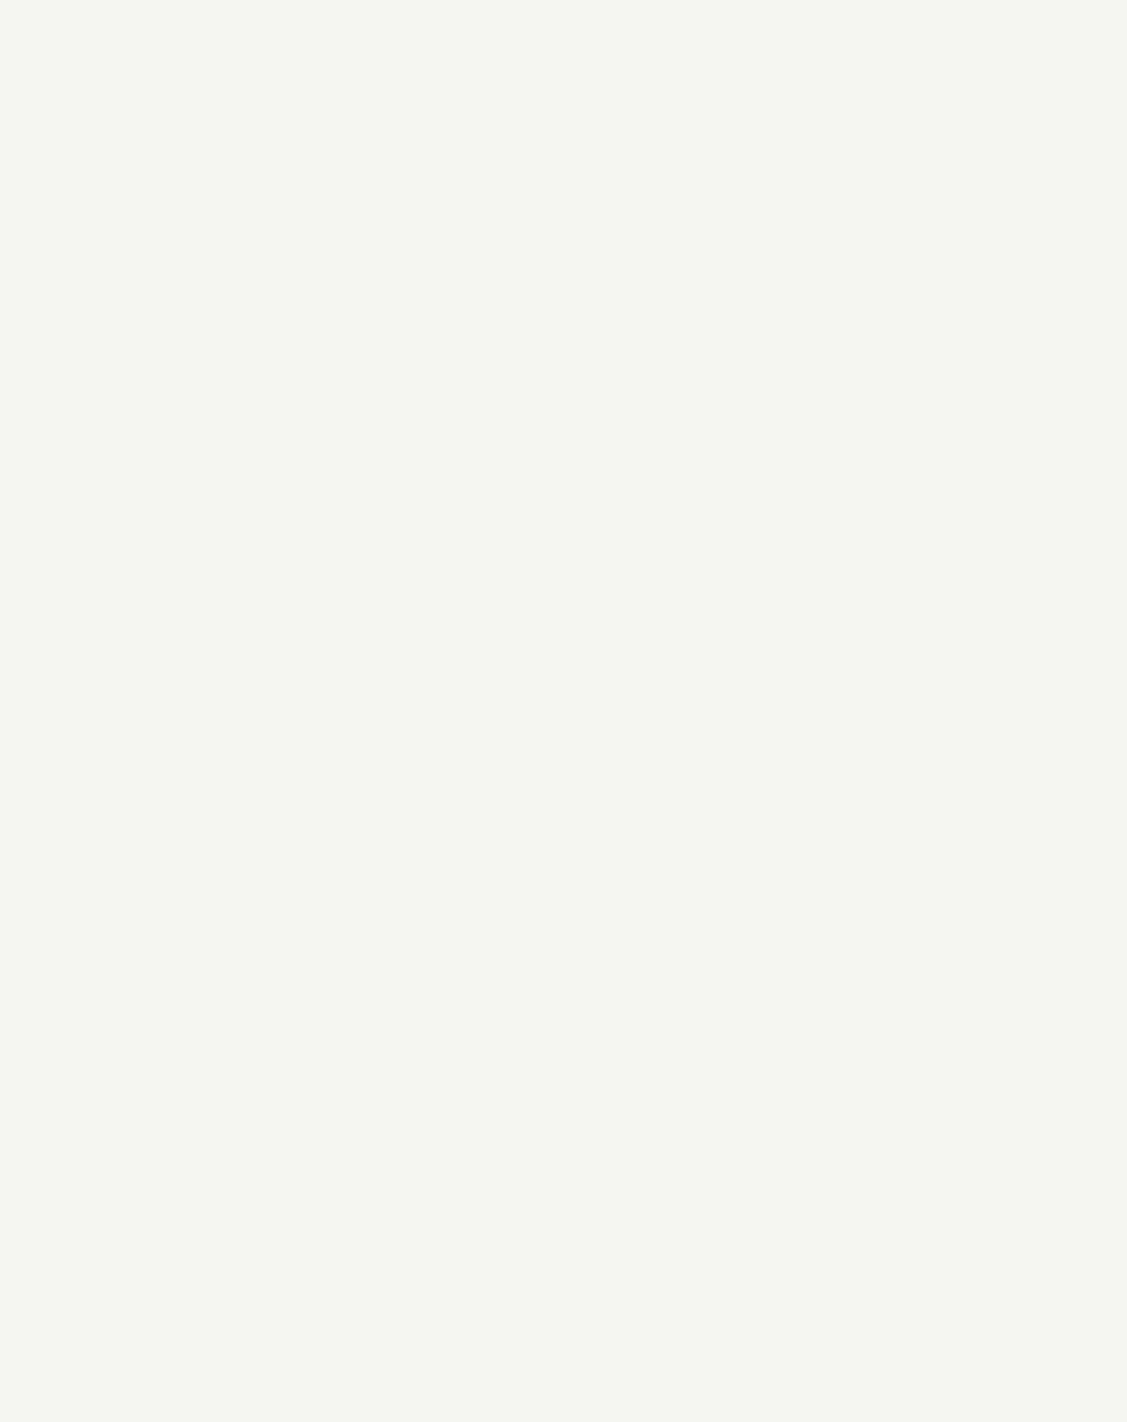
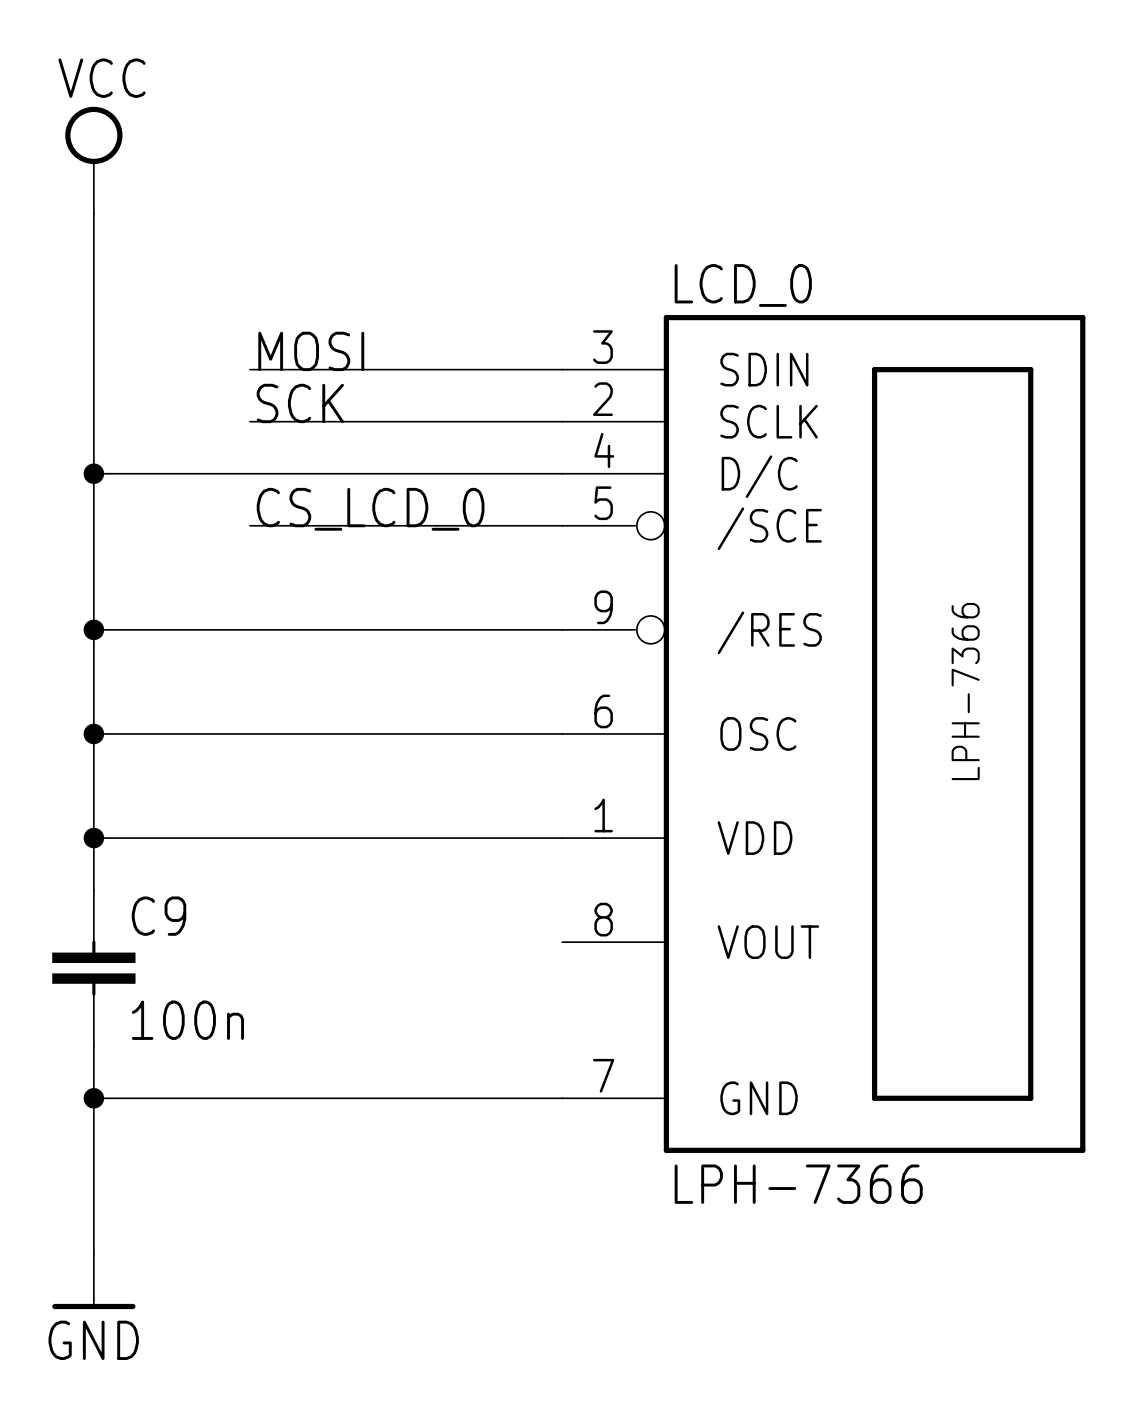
power symbol: none -> VCC (93, 160)
wire: none -> (93, 213) (93, 890)
label: none -> MOSI (311, 351)
wire: none -> (250, 369) (562, 369)
label: none -> SCK (300, 403)
wire: none -> (250, 421) (562, 421)
wire: none -> (93, 473) (562, 473)
junction: none -> (93, 473)
label: none -> CS_LCD_0 (370, 509)
wire: none -> (250, 525) (562, 525)
wire: none -> (93, 629) (562, 629)
junction: none -> (93, 629)
wire: none -> (93, 733) (562, 733)
junction: none -> (93, 733)
LCD_0: none -> LPH-7366 (823, 733)
wire: none -> (93, 838) (562, 838)
junction: none -> (93, 838)
C9: none -> 100n (93, 968)
wire: none -> (93, 1046) (93, 1254)
wire: none -> (93, 1098) (562, 1098)
junction: none -> (93, 1098)
power symbol: none -> GND (93, 1281)

